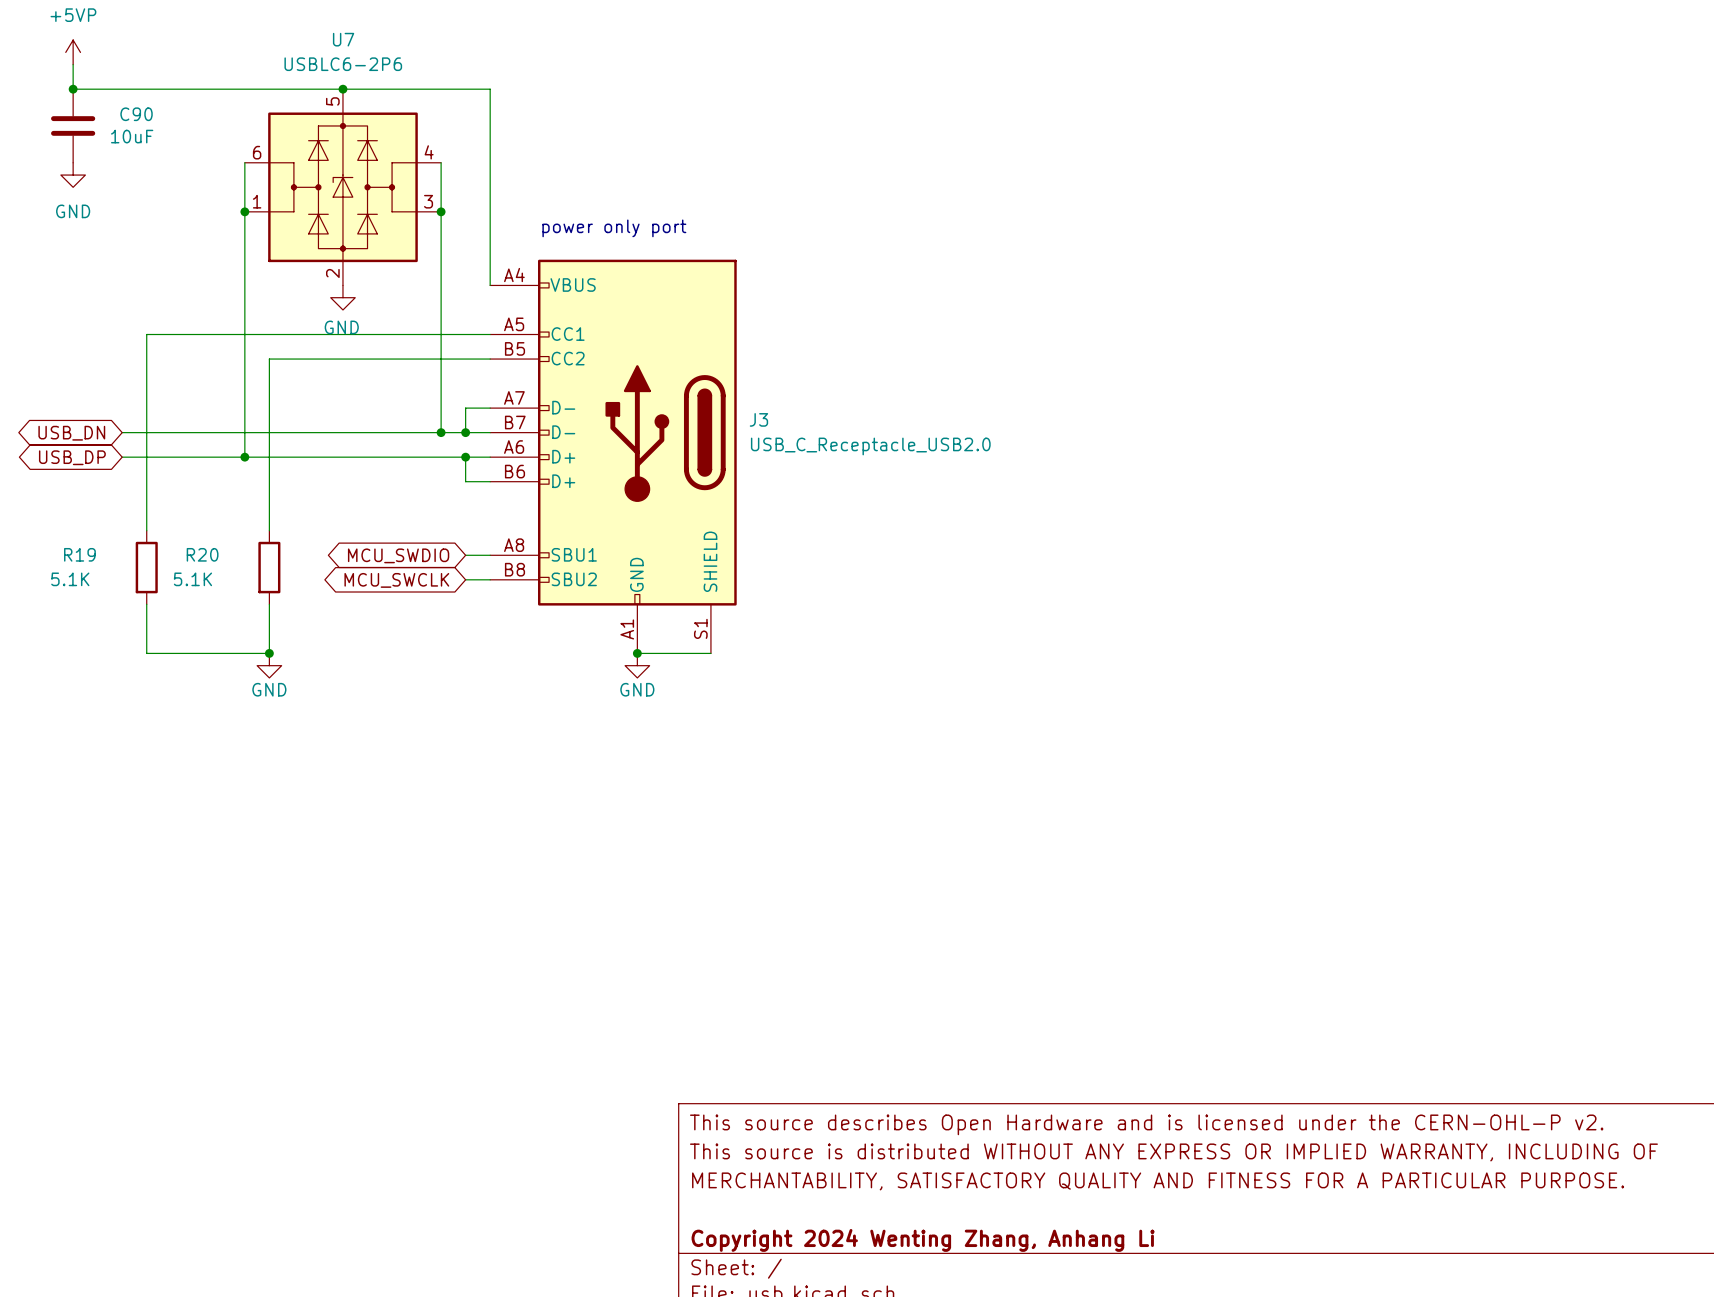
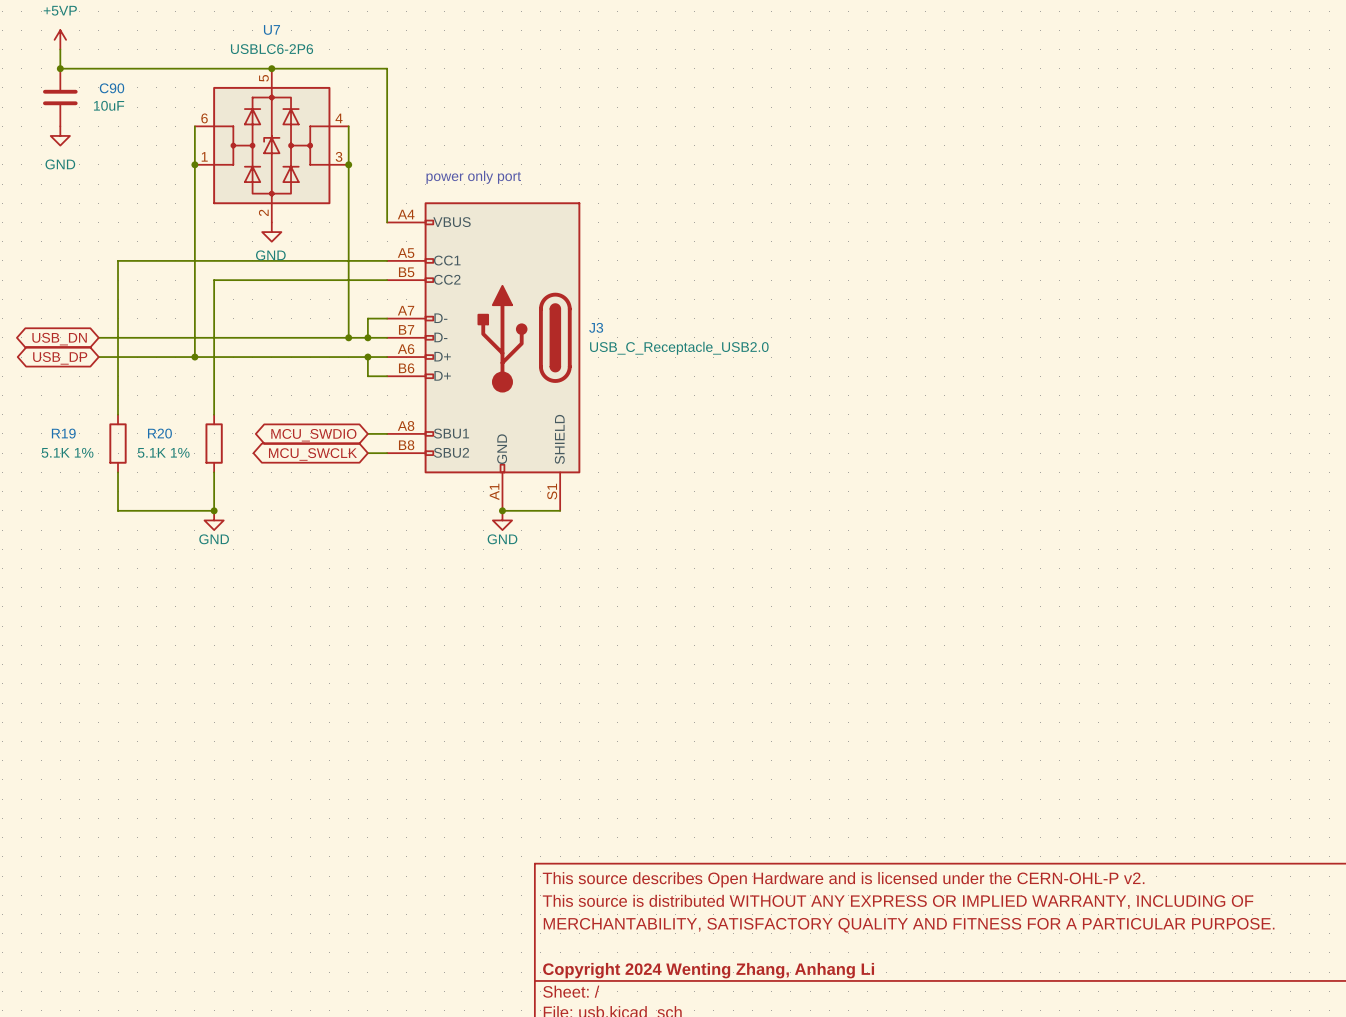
R19 value: 5.1K (70, 579) -> 5.1K 1% (67, 452)
R20 value: 5.1K (192, 579) -> 5.1K 1% (163, 452)

